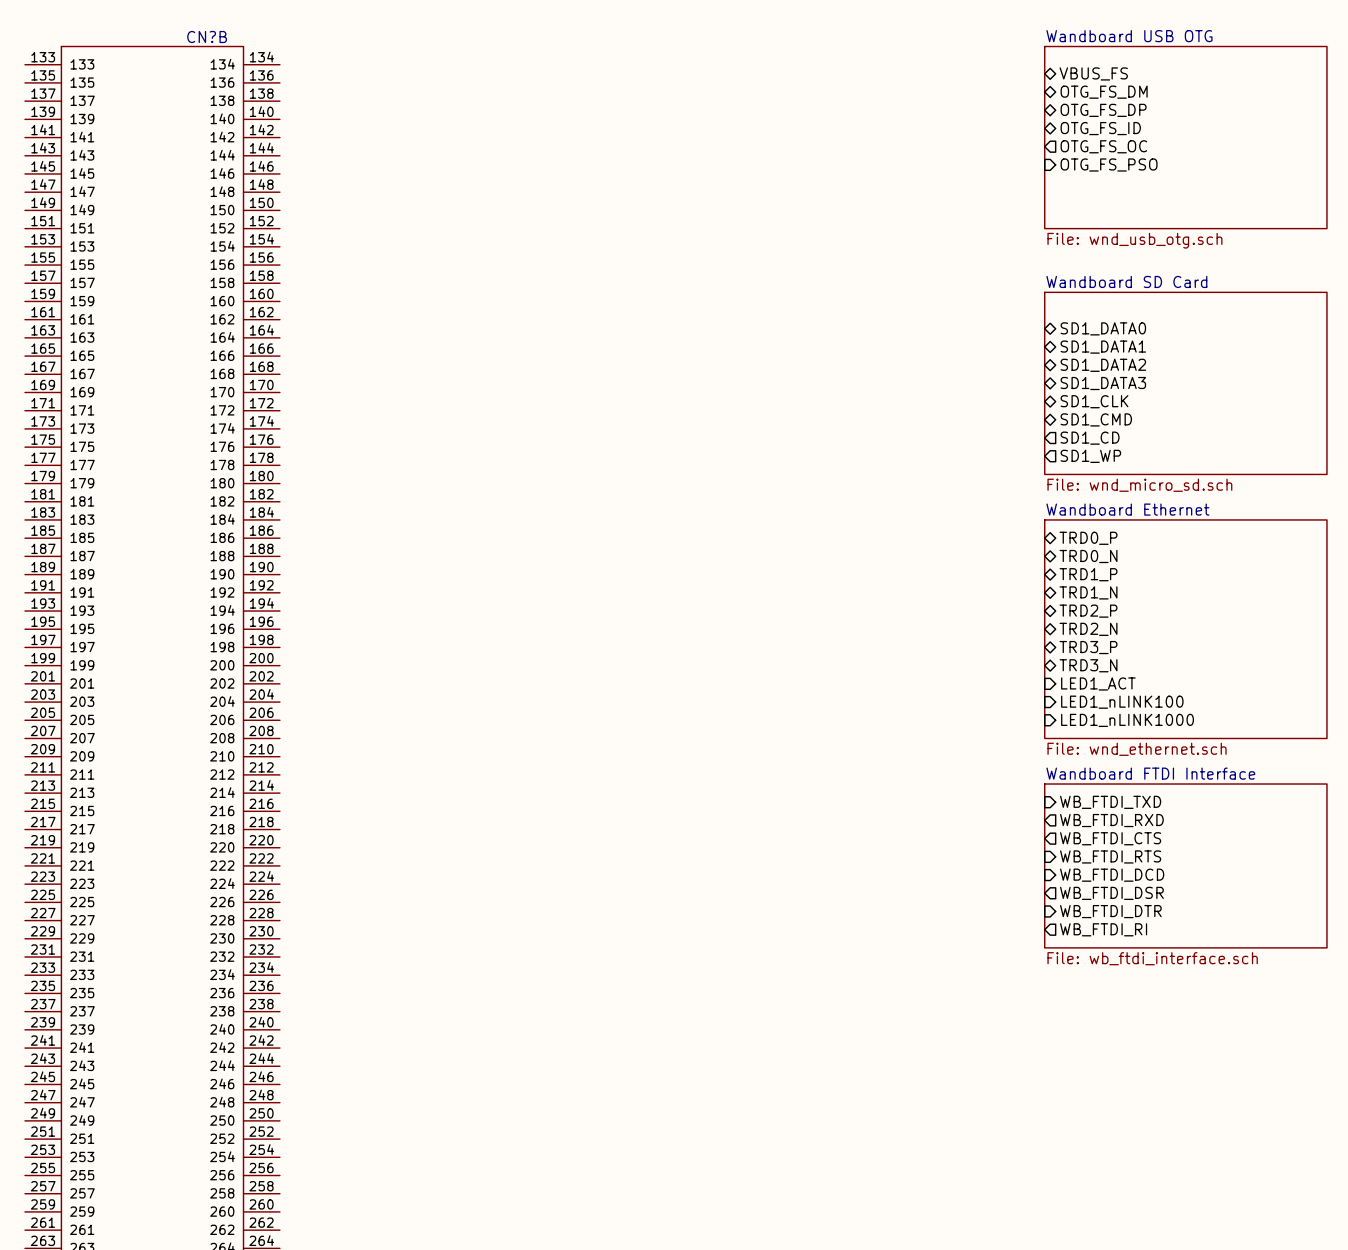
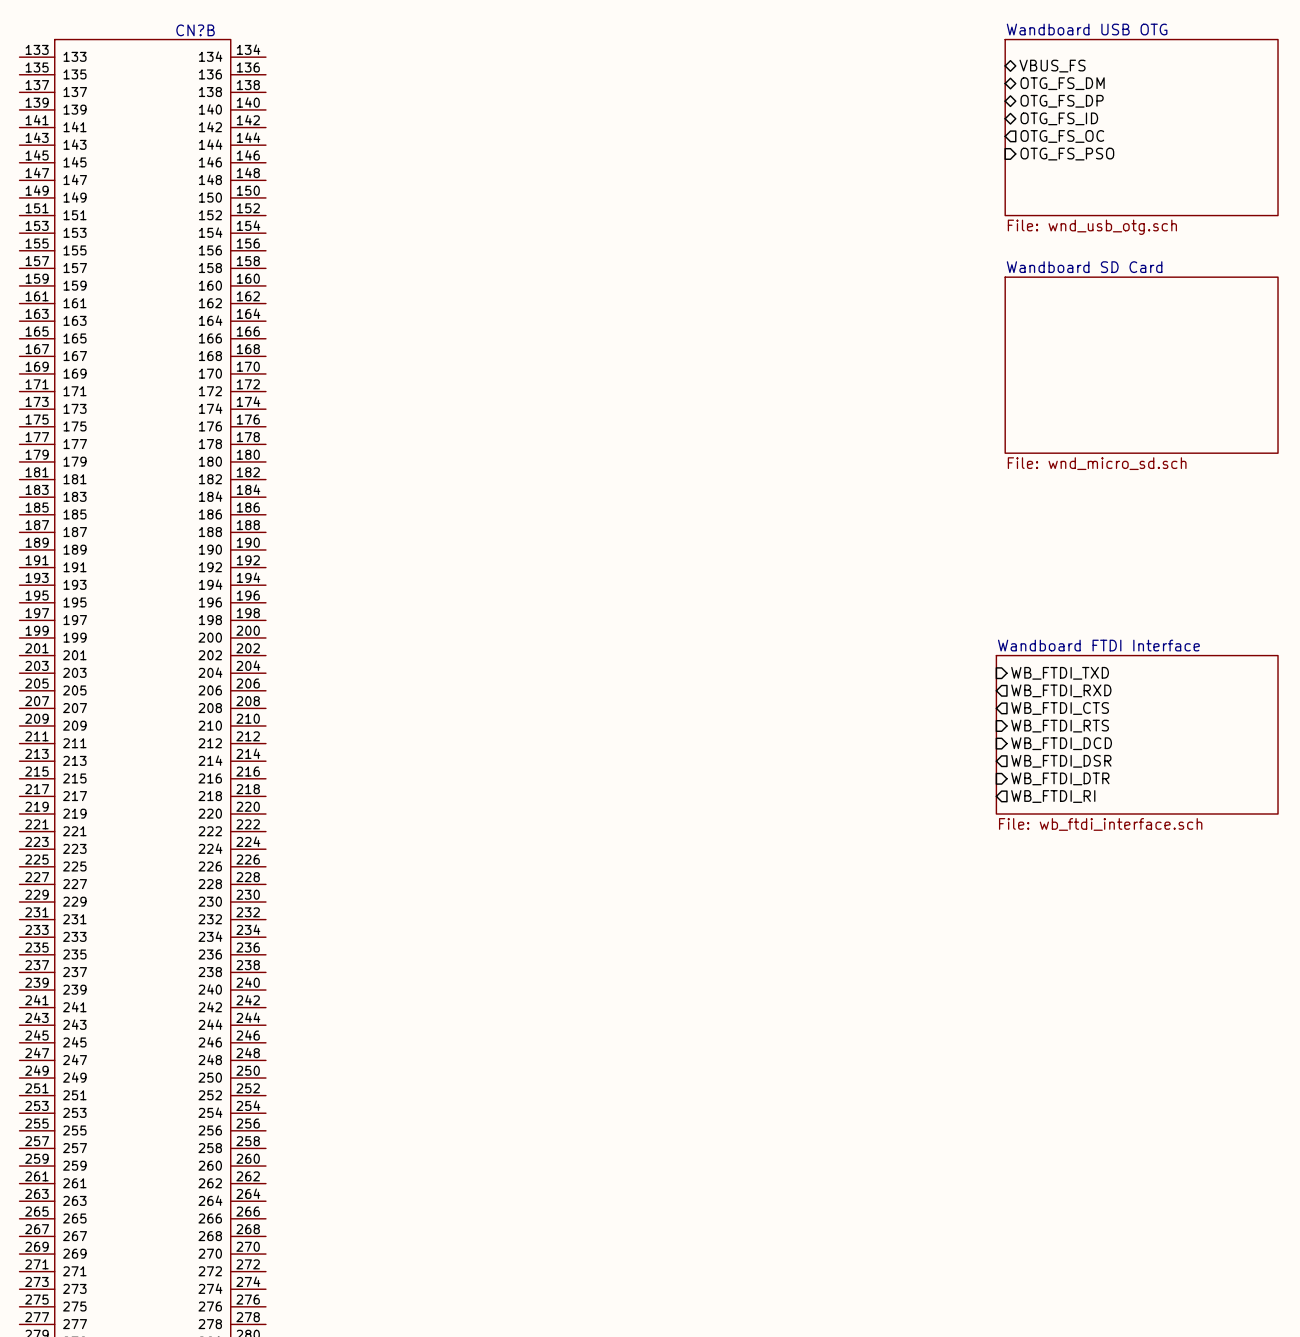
sheet pin: SD1_DATA0 (1103, 328) -> none
sheet pin: SD1_DATA1 (1103, 347) -> none
sheet pin: SD1_DATA2 (1103, 365) -> none
sheet pin: SD1_DATA3 (1103, 383) -> none
sheet pin: SD1_CLK (1094, 401) -> none
sheet pin: SD1_CMD (1096, 419) -> none
sheet pin: SD1_CD (1090, 438) -> none
sheet pin: SD1_WP (1090, 456) -> none
sheet pin: TRD0_P (1088, 538) -> none
sheet pin: TRD0_N (1088, 556) -> none
sheet pin: TRD1_P (1088, 574) -> none
sheet pin: TRD1_N (1088, 592) -> none
sheet pin: TRD2_P (1088, 611) -> none
sheet pin: TRD2_N (1088, 629) -> none
sheet Wandboard Ethernet: File: wnd_ethernet.sch (1185, 629) -> none
sheet pin: TRD3_P (1088, 647) -> none
sheet pin: TRD3_N (1088, 665) -> none
sheet pin: LED1_ACT (1098, 683) -> none
sheet pin: LED1_nLINK100 (1122, 702) -> none
sheet pin: LED1_nLINK1000 (1127, 720) -> none
sheet Wandboard FTDI Interface: none -> File: wb_ftdi_interface.sch (1137, 734)
sheet pin position: WB_FTDI_TXD (1110, 802) -> WB_FTDI_TXD (1060, 673)
sheet pin position: WB_FTDI_RXD (1111, 820) -> WB_FTDI_RXD (1061, 690)
sheet pin position: WB_FTDI_CTS (1110, 838) -> WB_FTDI_CTS (1060, 708)
sheet pin position: WB_FTDI_RTS (1110, 856) -> WB_FTDI_RTS (1060, 726)
sheet Wandboard FTDI Interface: File: wb_ftdi_interface.sch (1185, 865) -> none
sheet pin position: WB_FTDI_DCD (1112, 875) -> WB_FTDI_DCD (1061, 743)
sheet pin position: WB_FTDI_DSR (1111, 893) -> WB_FTDI_DSR (1061, 761)
sheet pin position: WB_FTDI_DTR (1110, 911) -> WB_FTDI_DTR (1060, 778)
sheet pin position: WB_FTDI_RI (1103, 929) -> WB_FTDI_RI (1053, 796)

